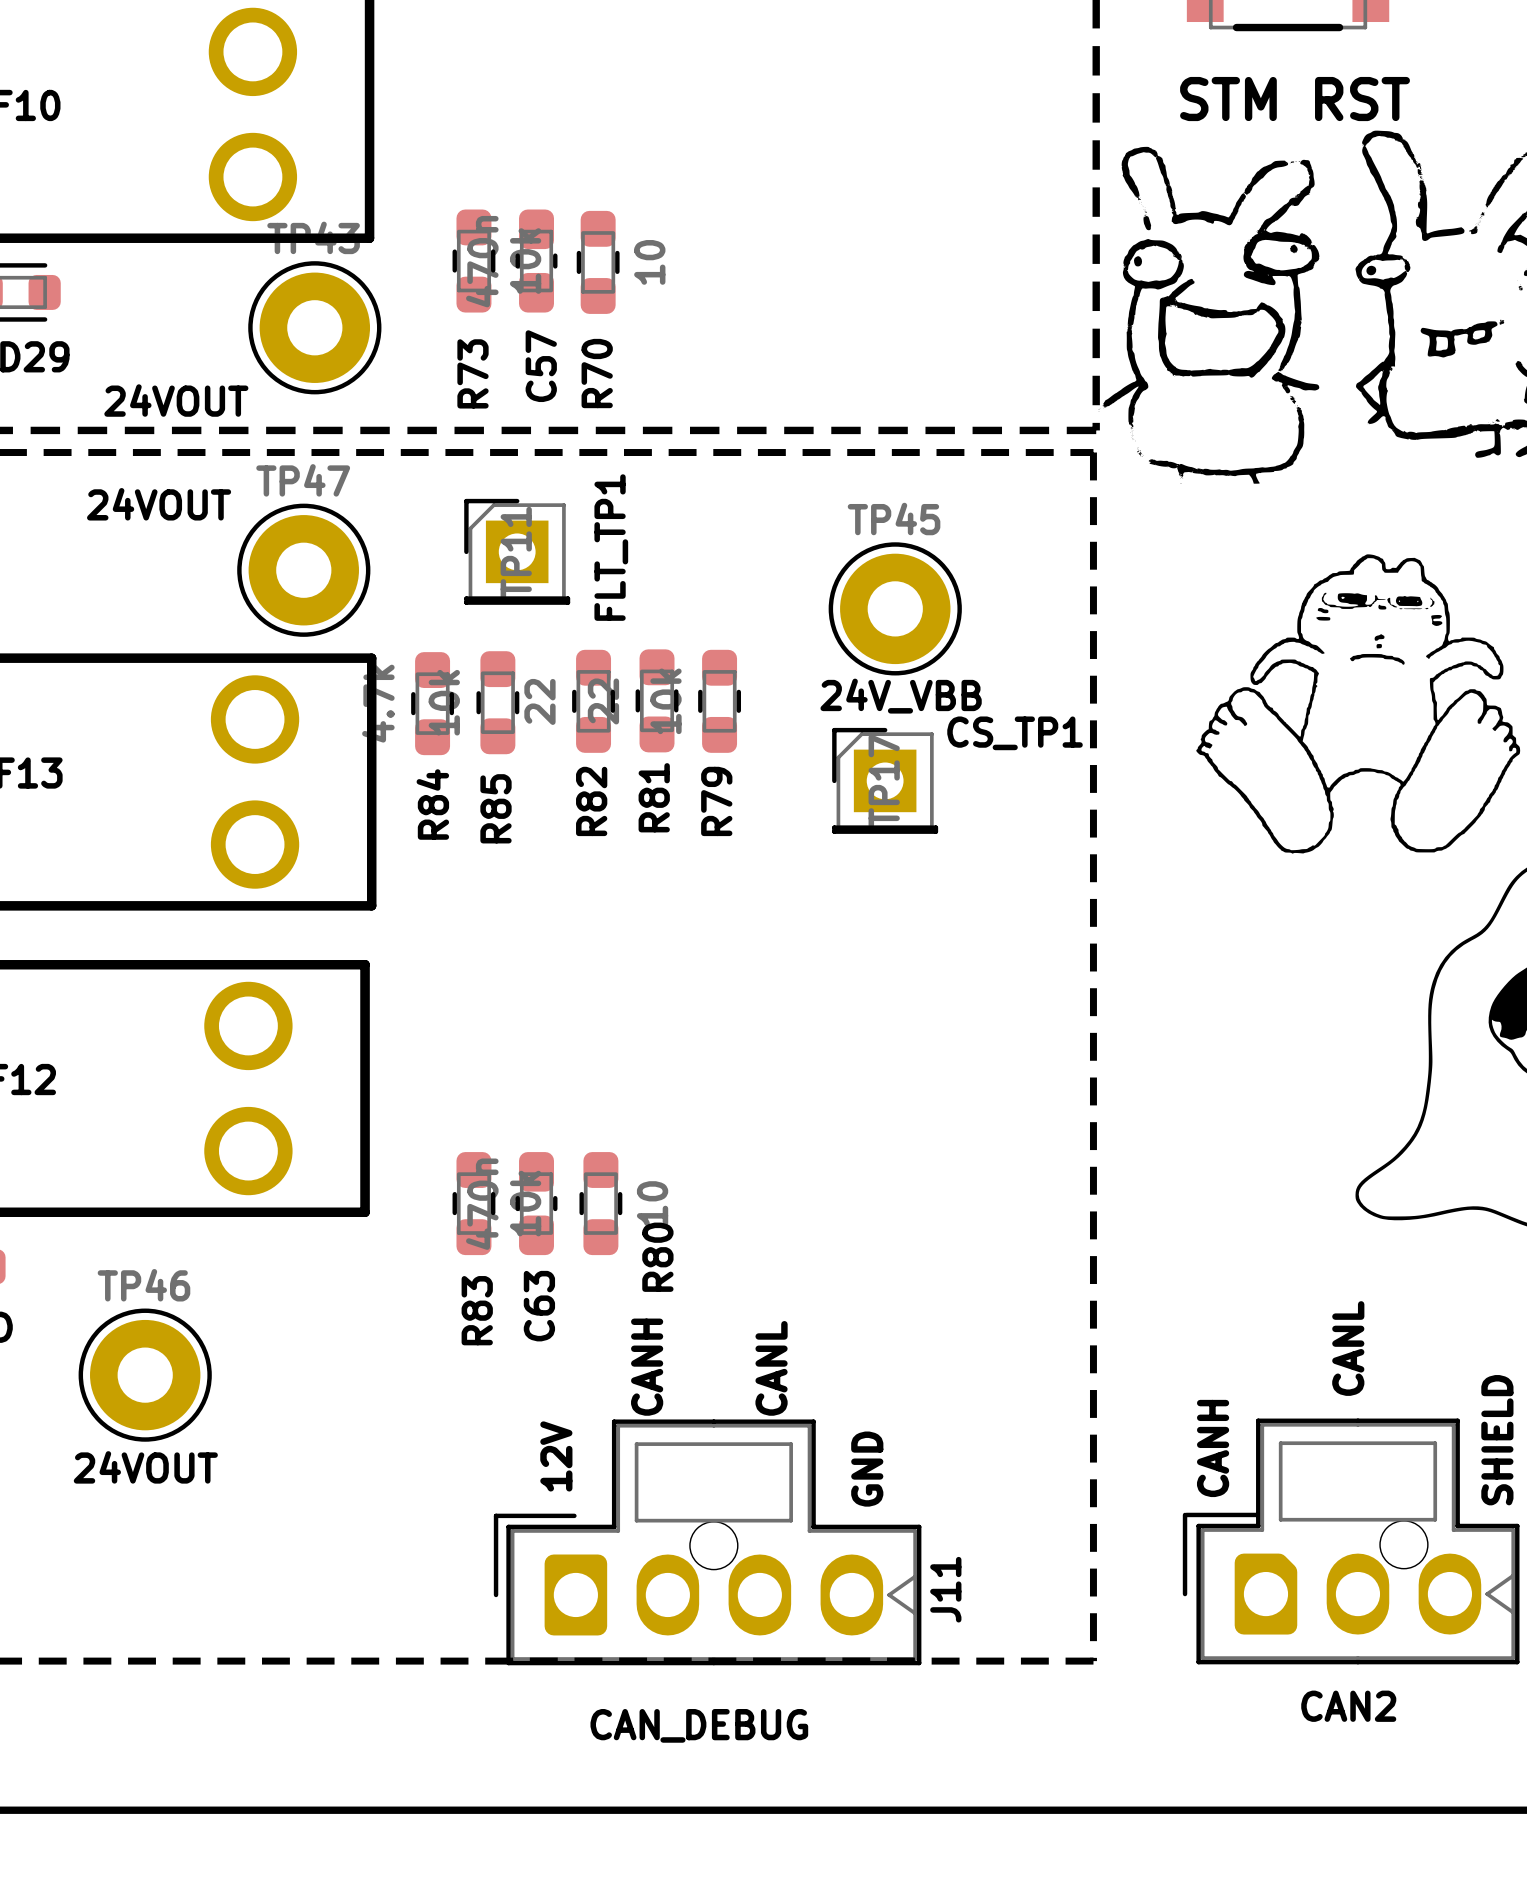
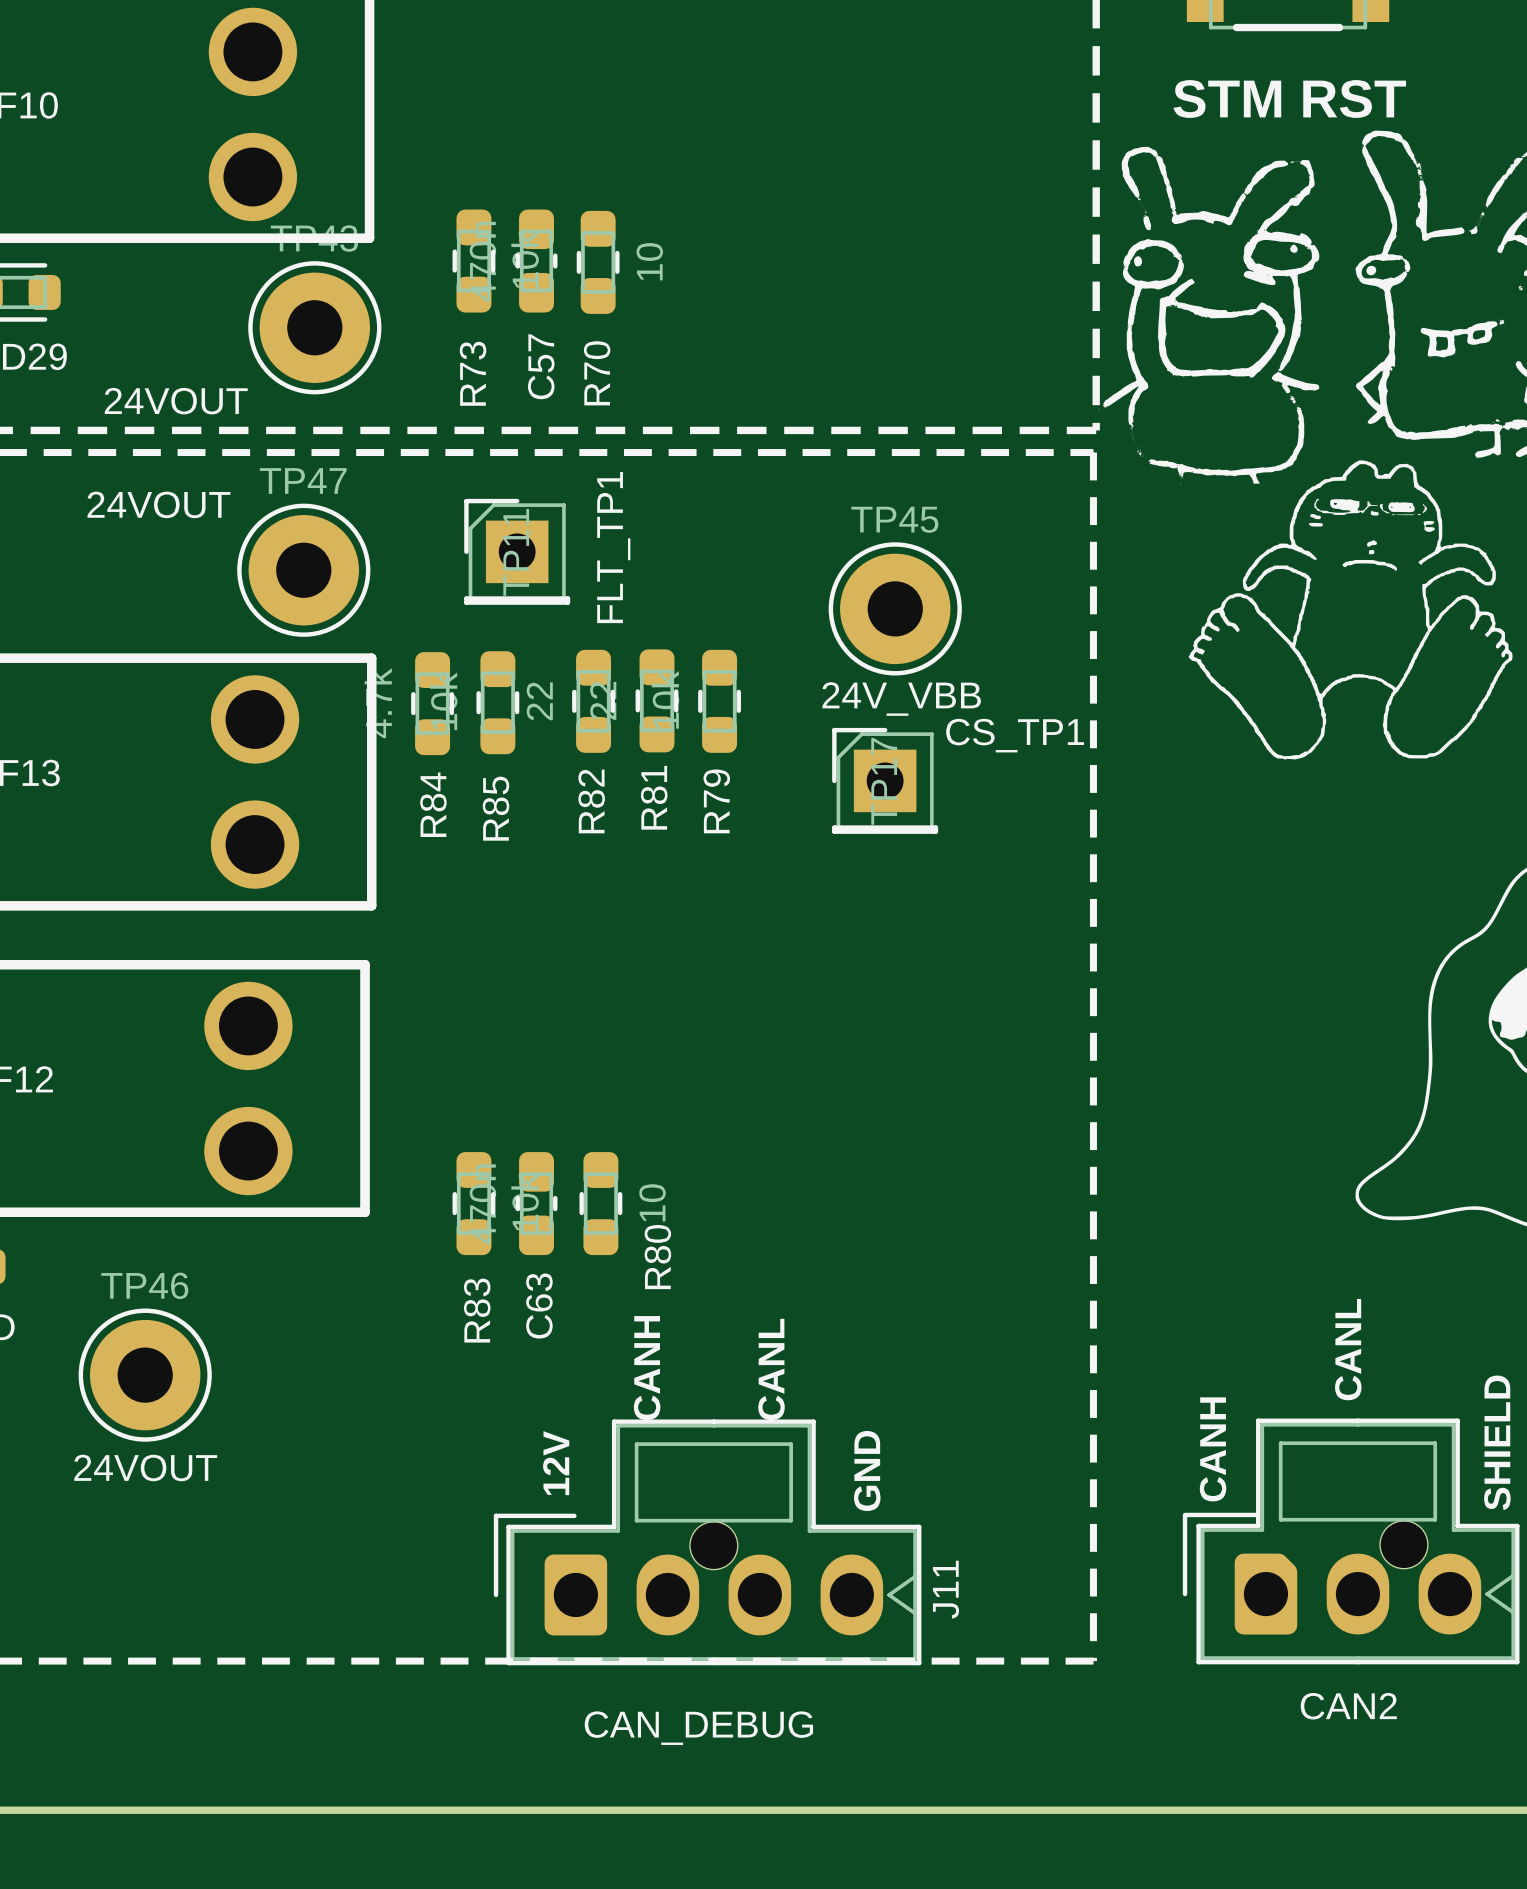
drawing position: (1358, 703) -> (1350, 609)

